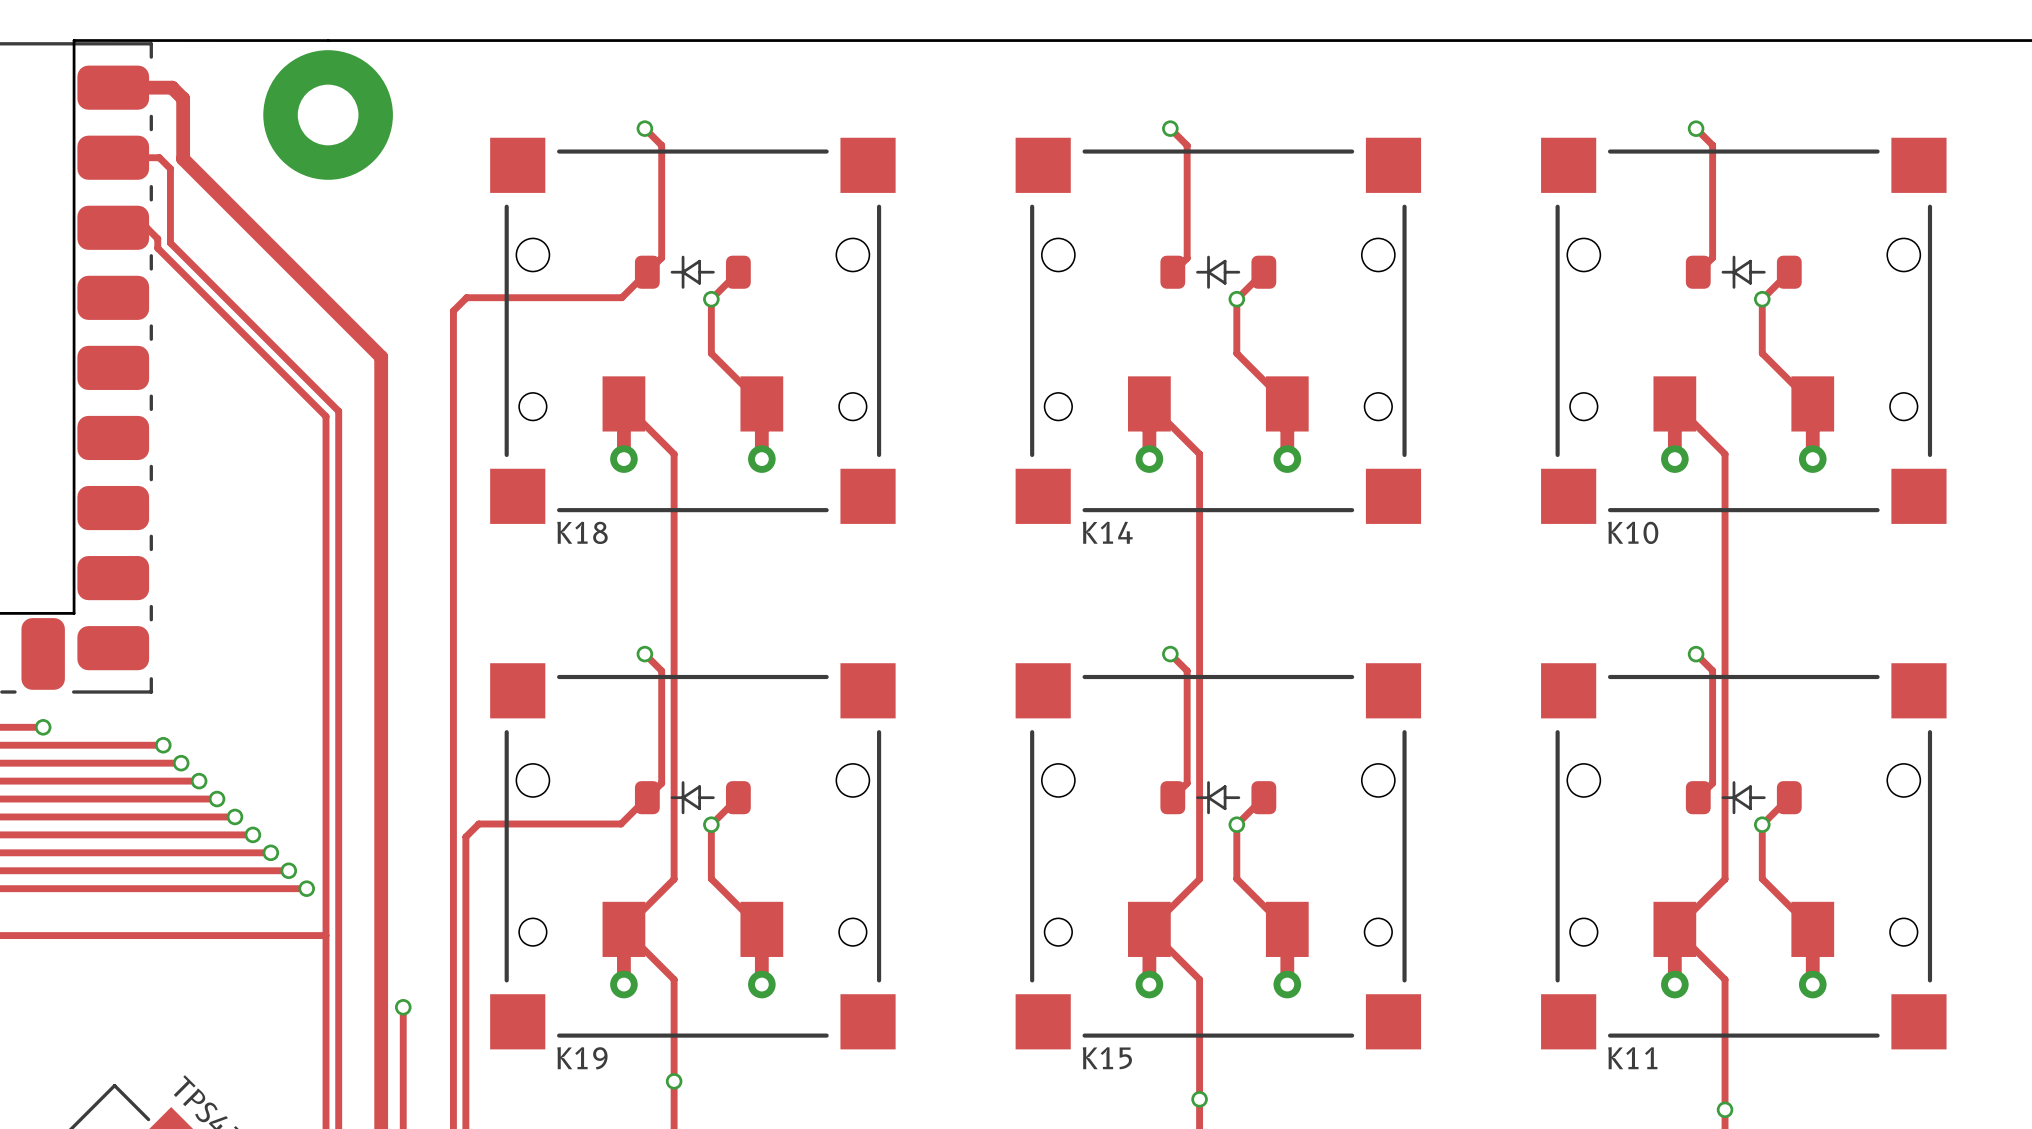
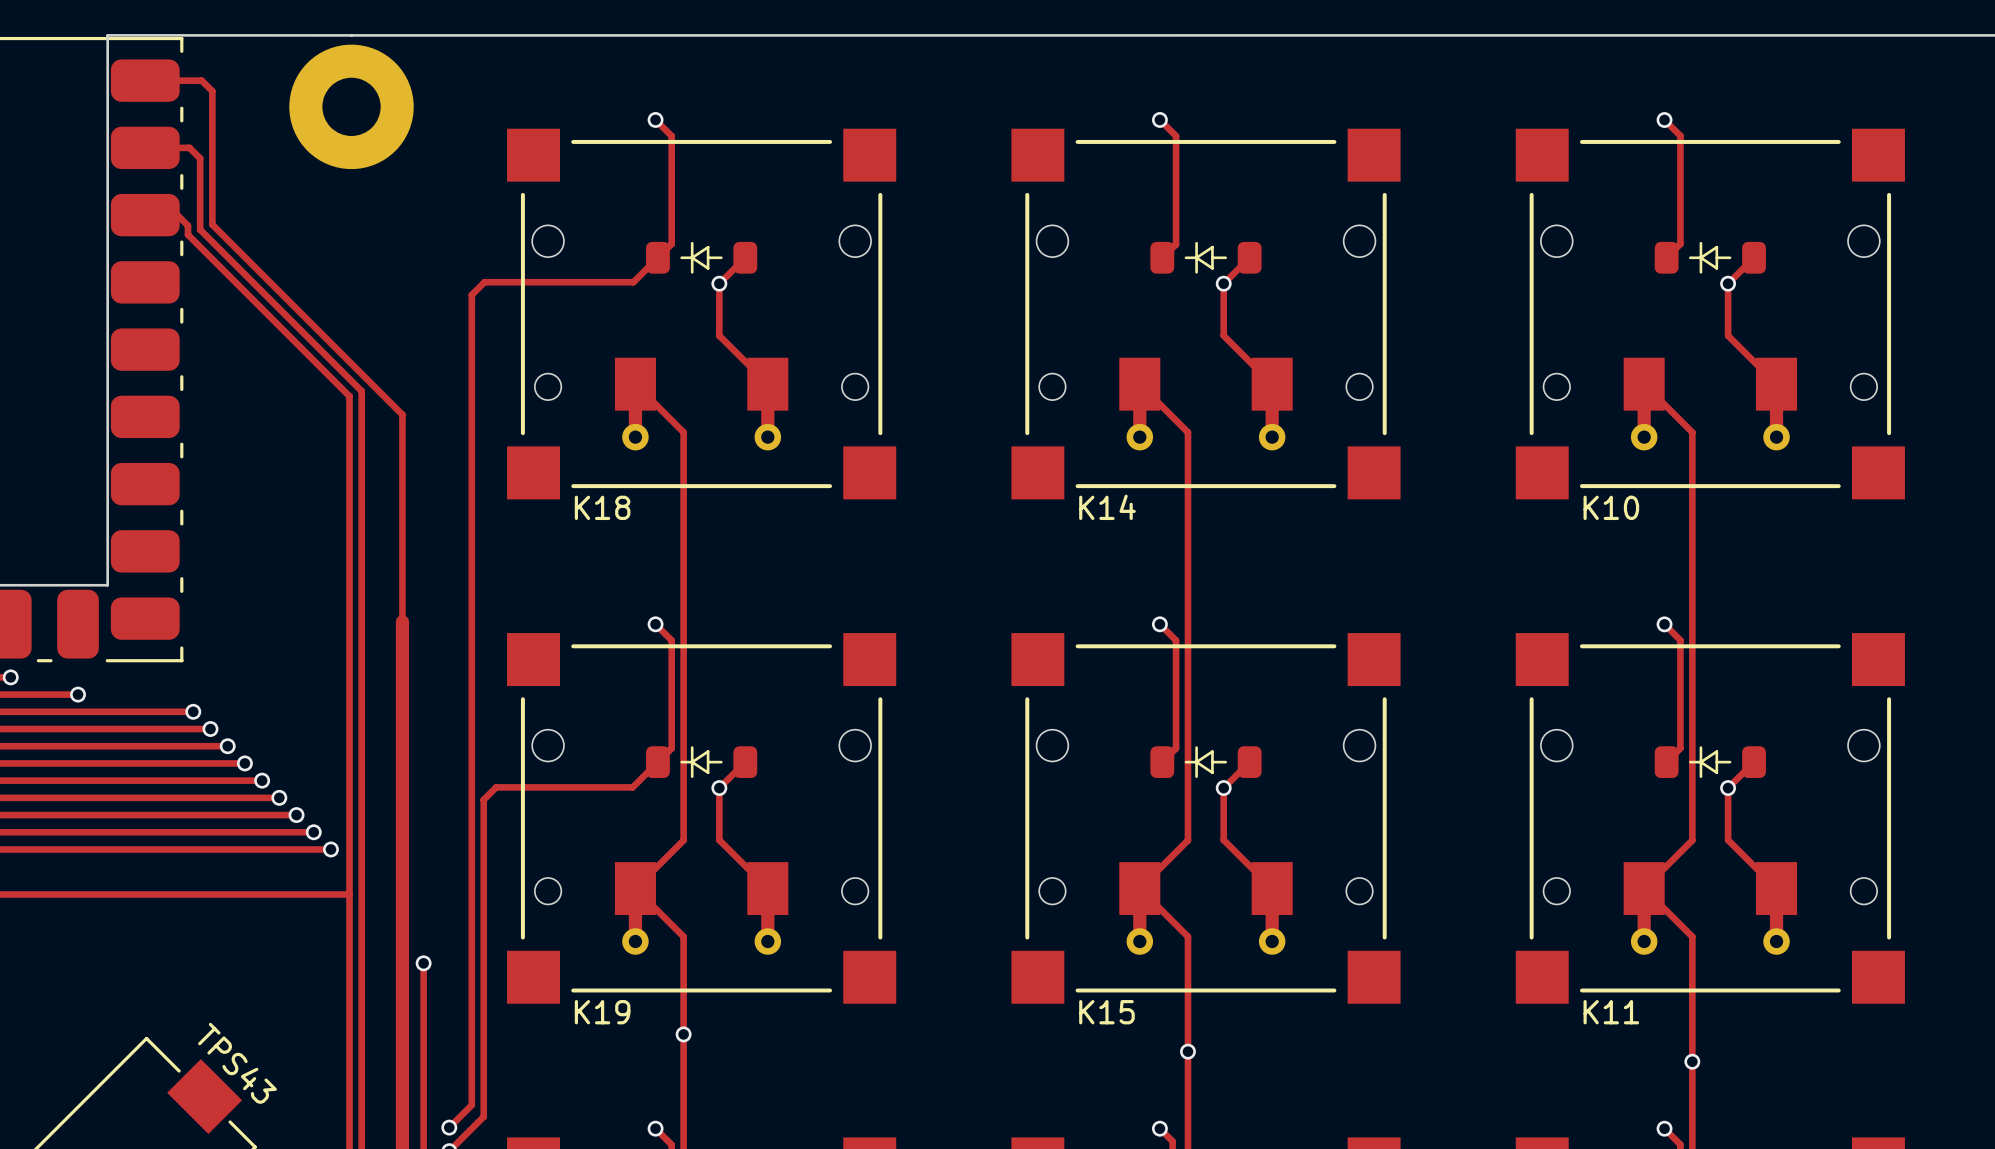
track width: thick (113, 87) (172, 87) (183, 98) (183, 159) -> thin (145, 80) (201, 80) (212, 91) (212, 149)
track: (183, 159) (381, 357) (381, 435) -> (212, 149) (212, 224) (402, 414)
track width: thick (381, 435) (381, 651) -> thin (402, 414) (402, 621)

